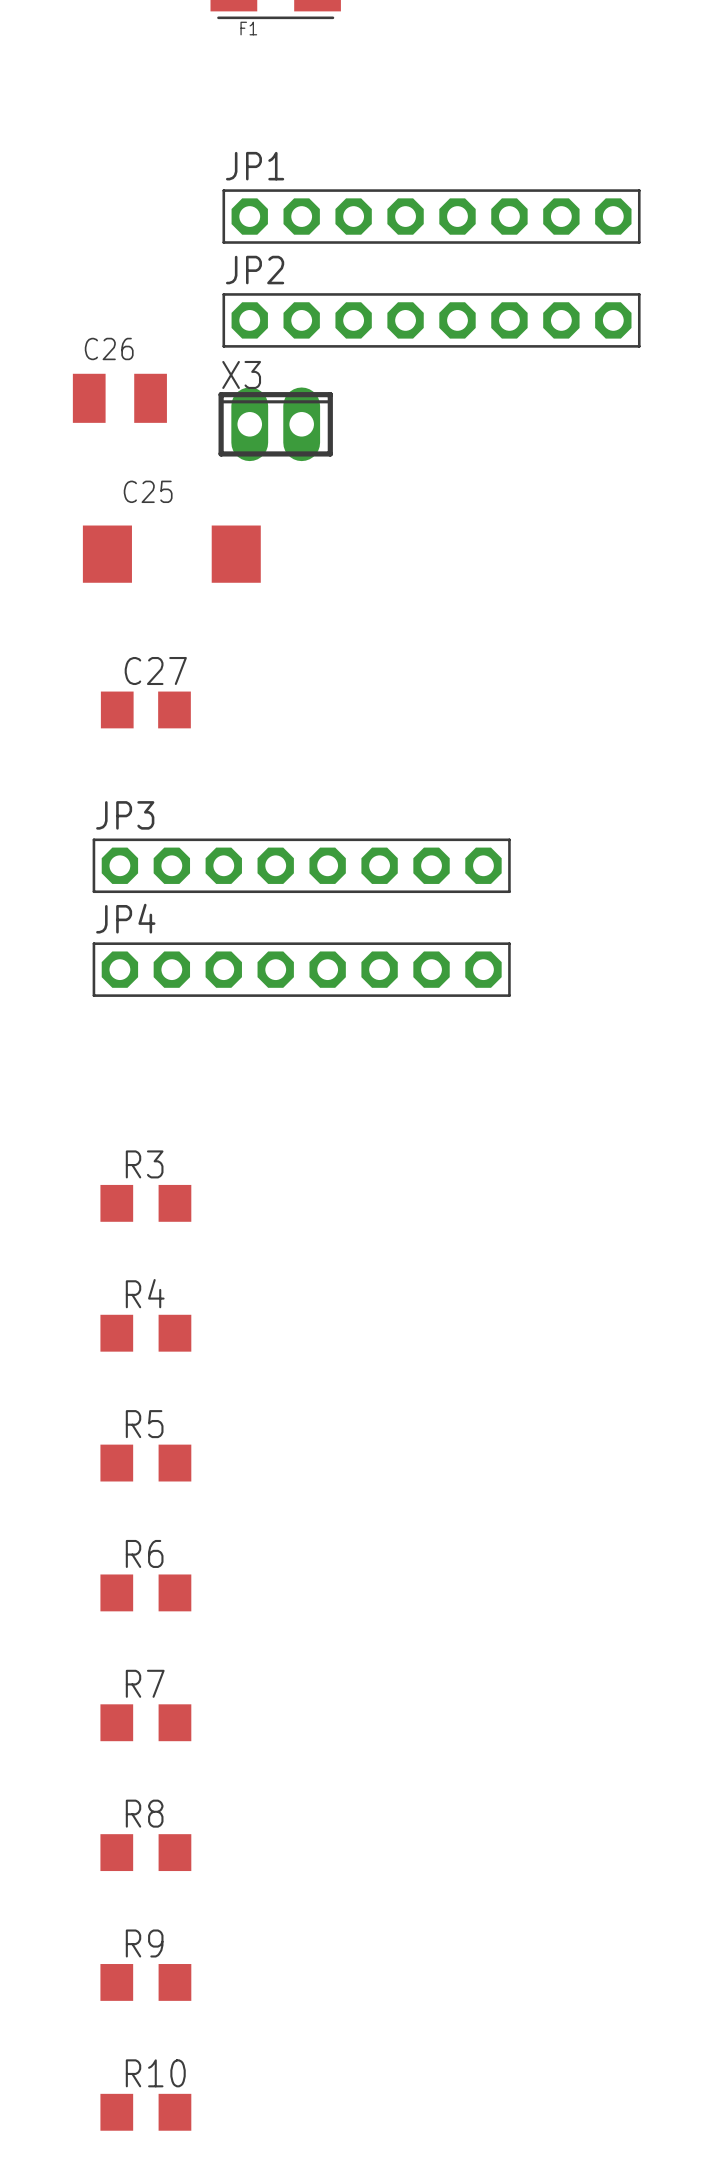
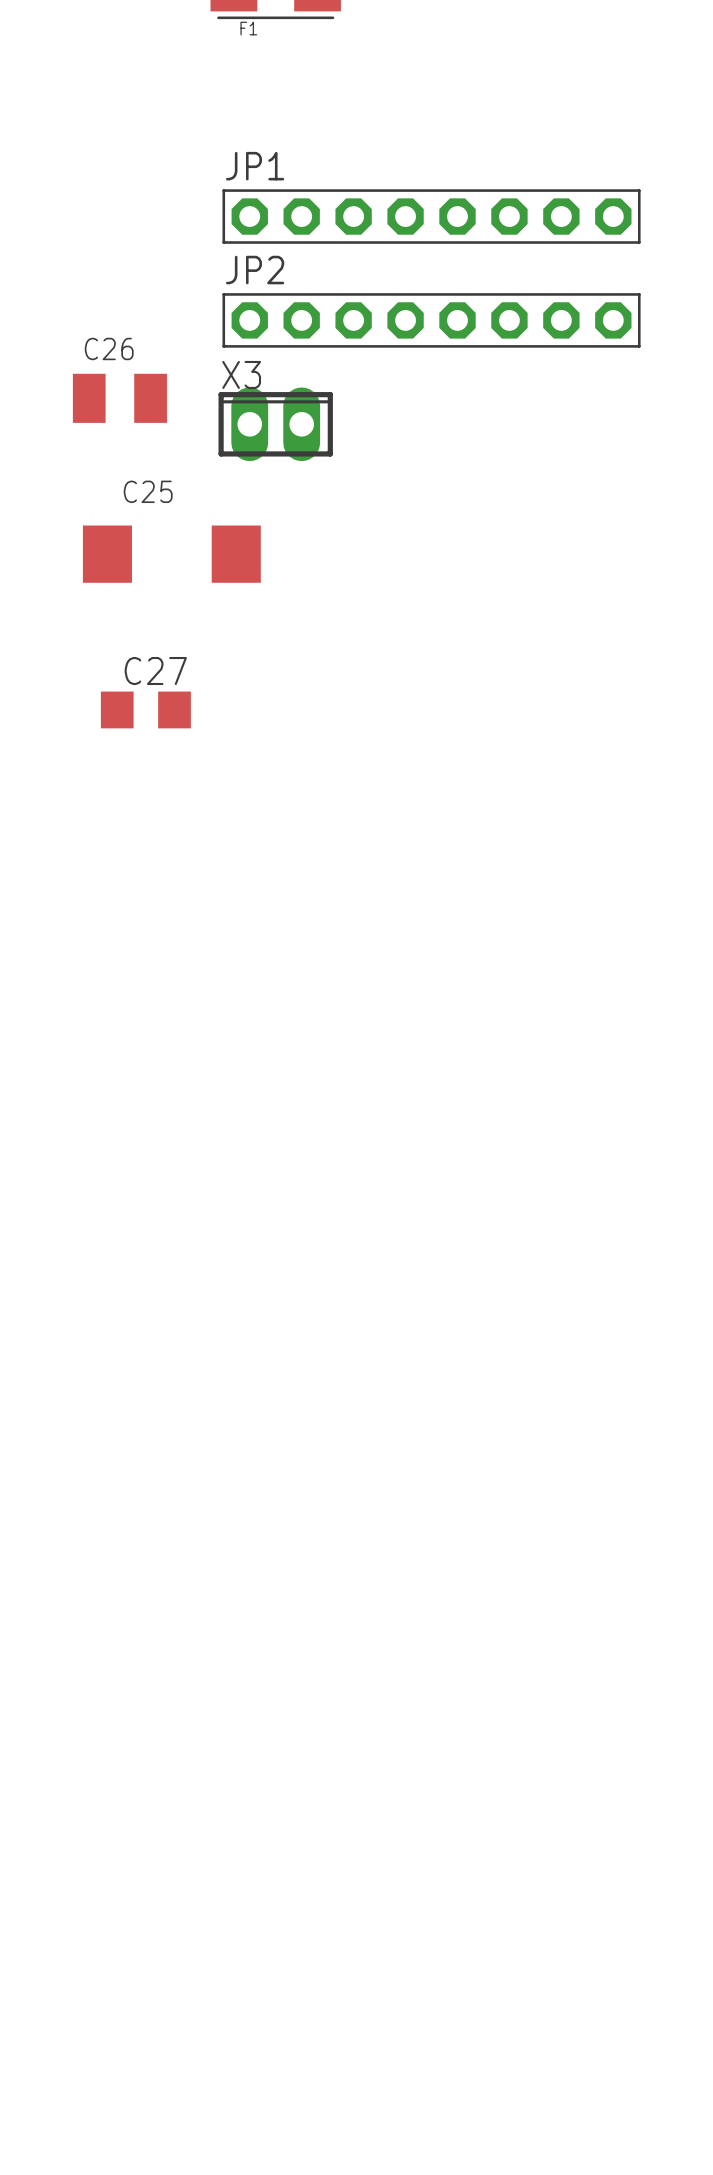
JP3: (301, 865) -> none
JP4: (301, 969) -> none
R3: (145, 1203) -> none
R4: (145, 1333) -> none
R5: (145, 1463) -> none
R6: (145, 1592) -> none
R7: (145, 1722) -> none
R8: (145, 1852) -> none
R9: (145, 1982) -> none
R10: (145, 2112) -> none

